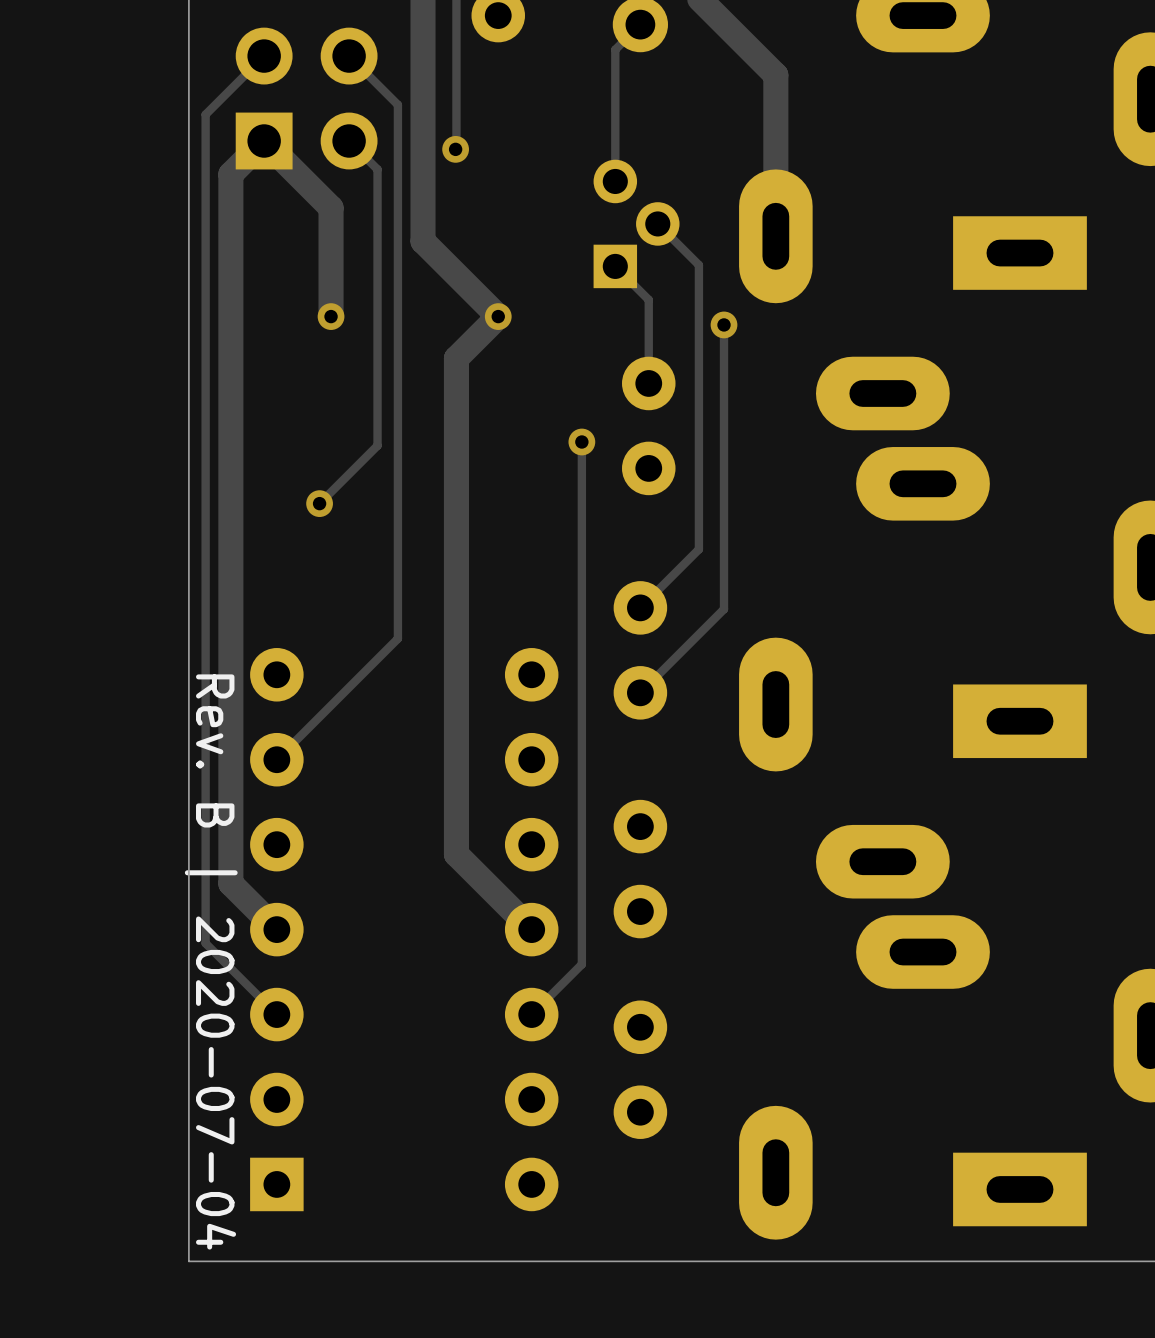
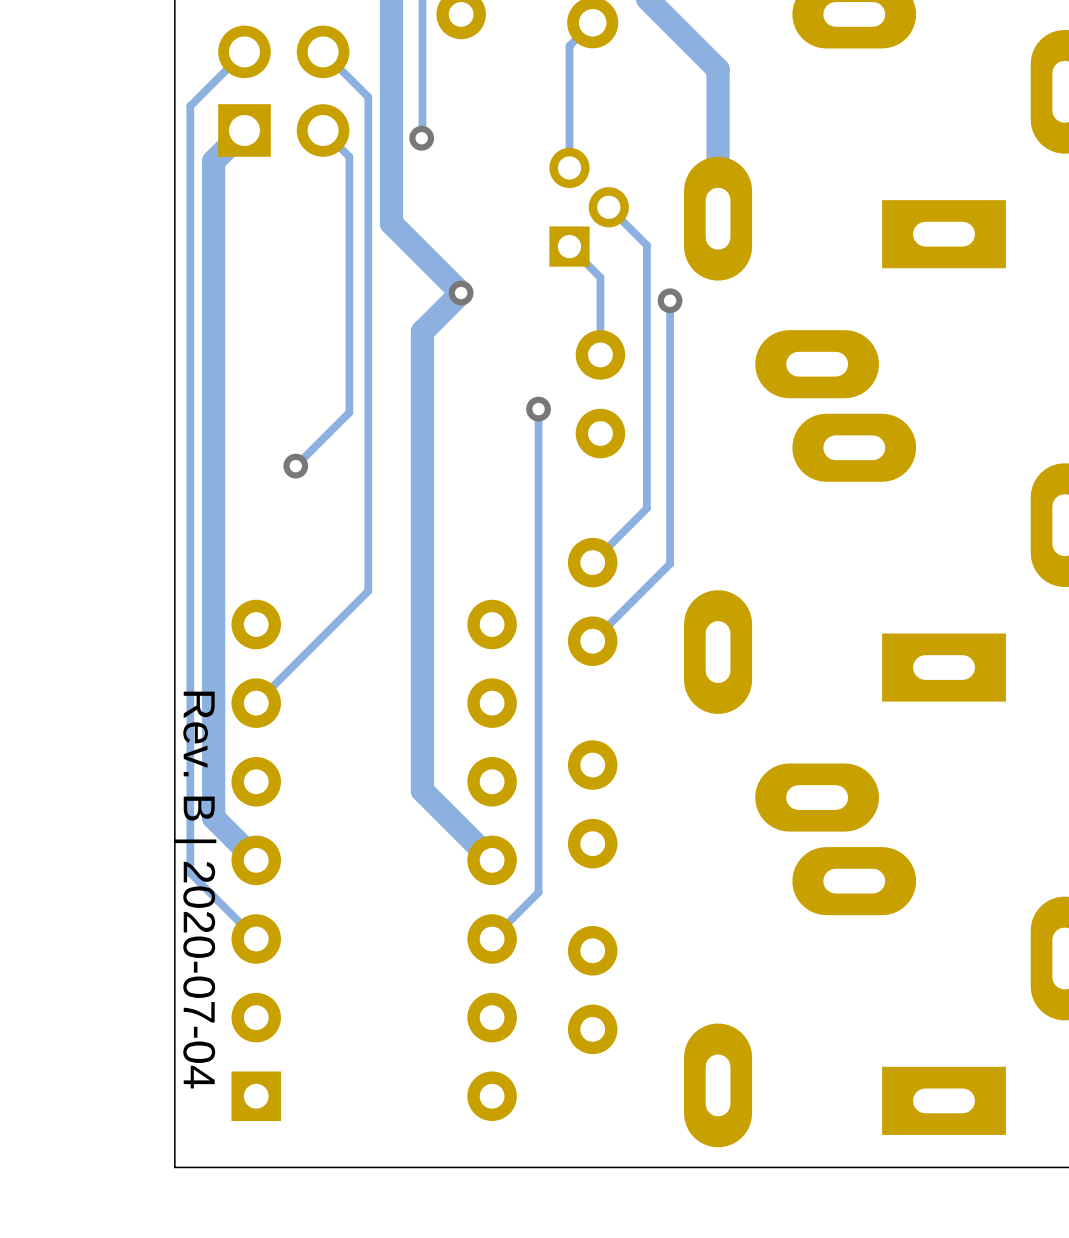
track: (264, 141) (331, 207) (331, 316) -> none
via: (331, 316) -> none

